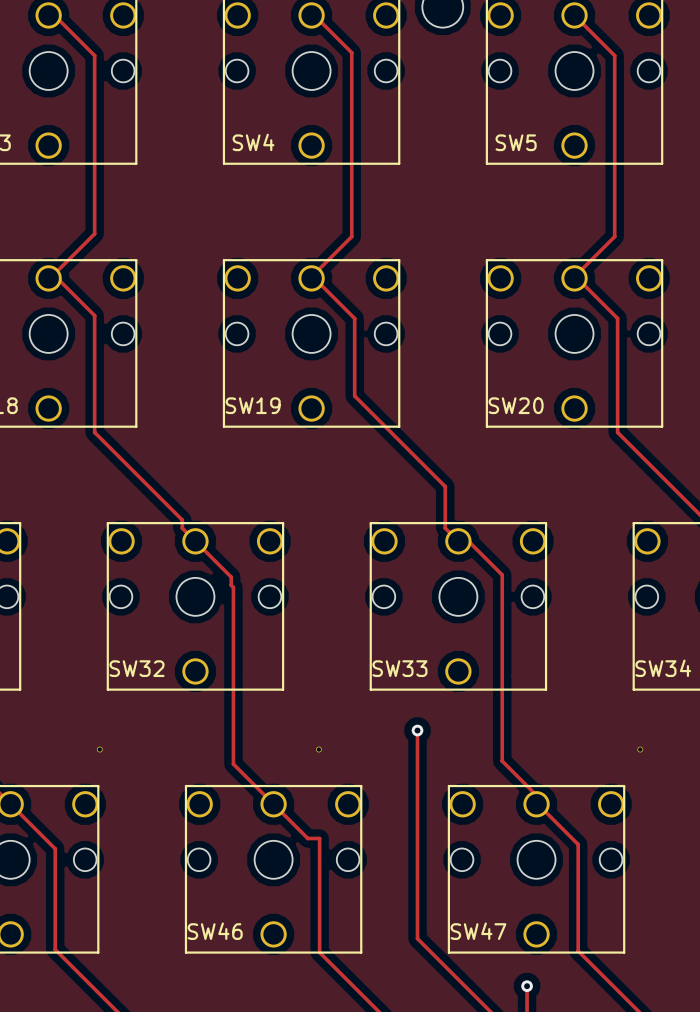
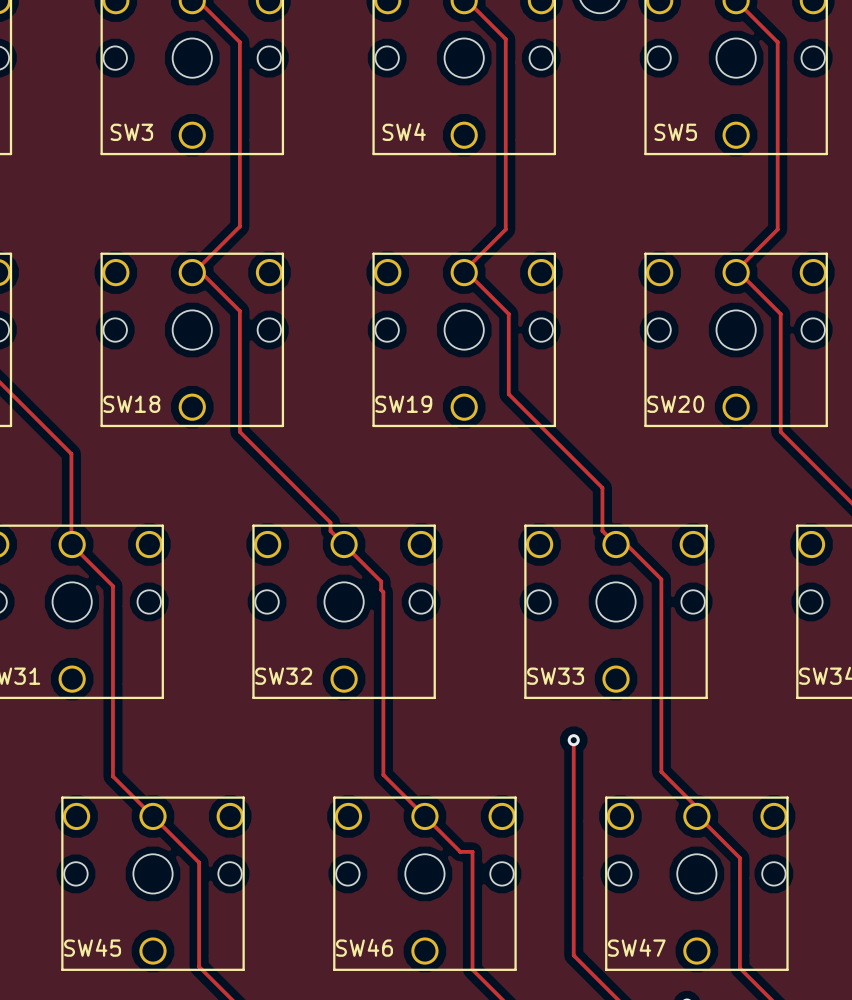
part: (99, 749) -> none
part: (318, 749) -> none
part: (640, 749) -> none

